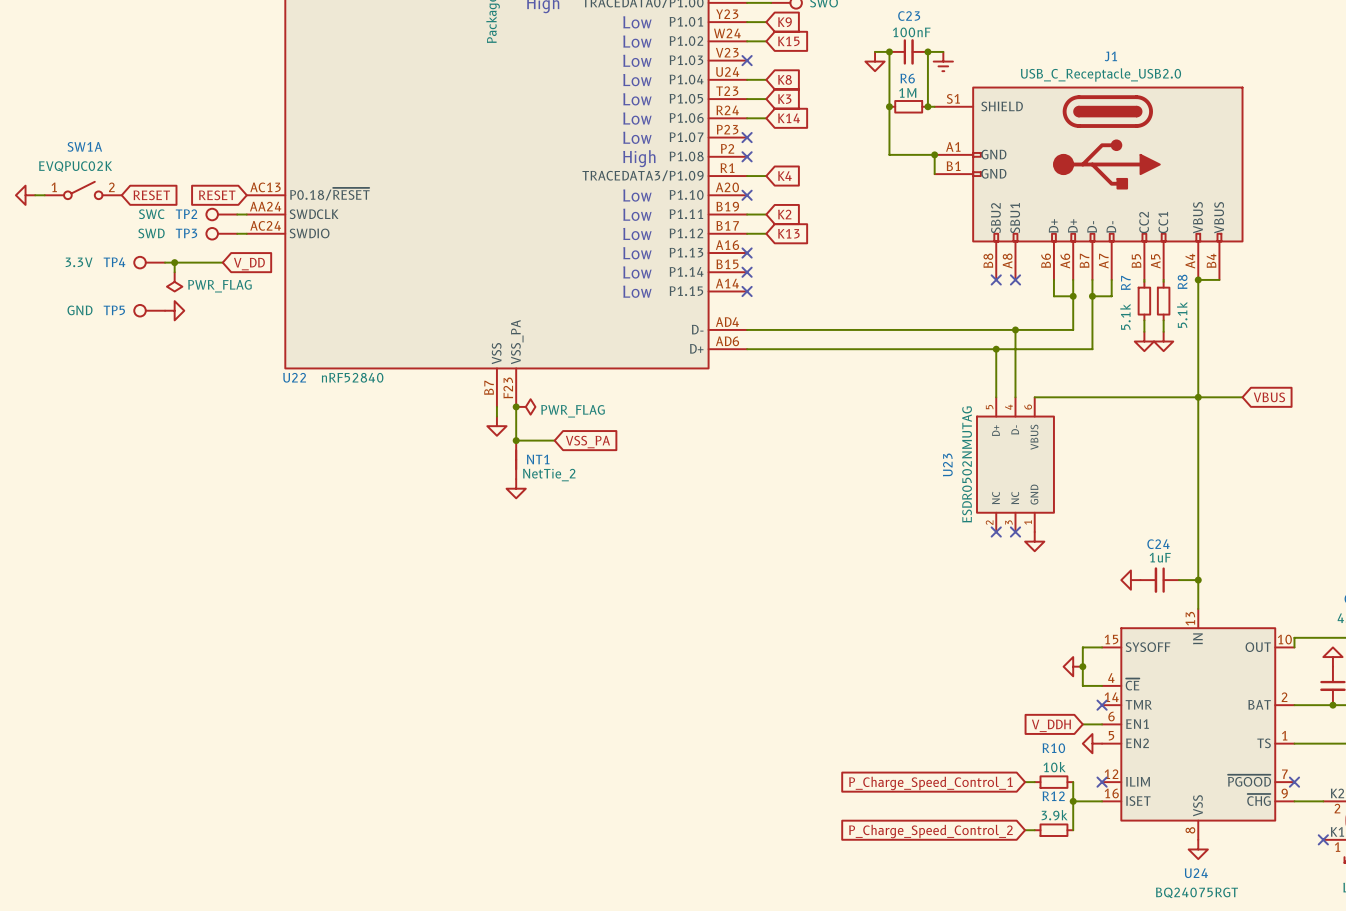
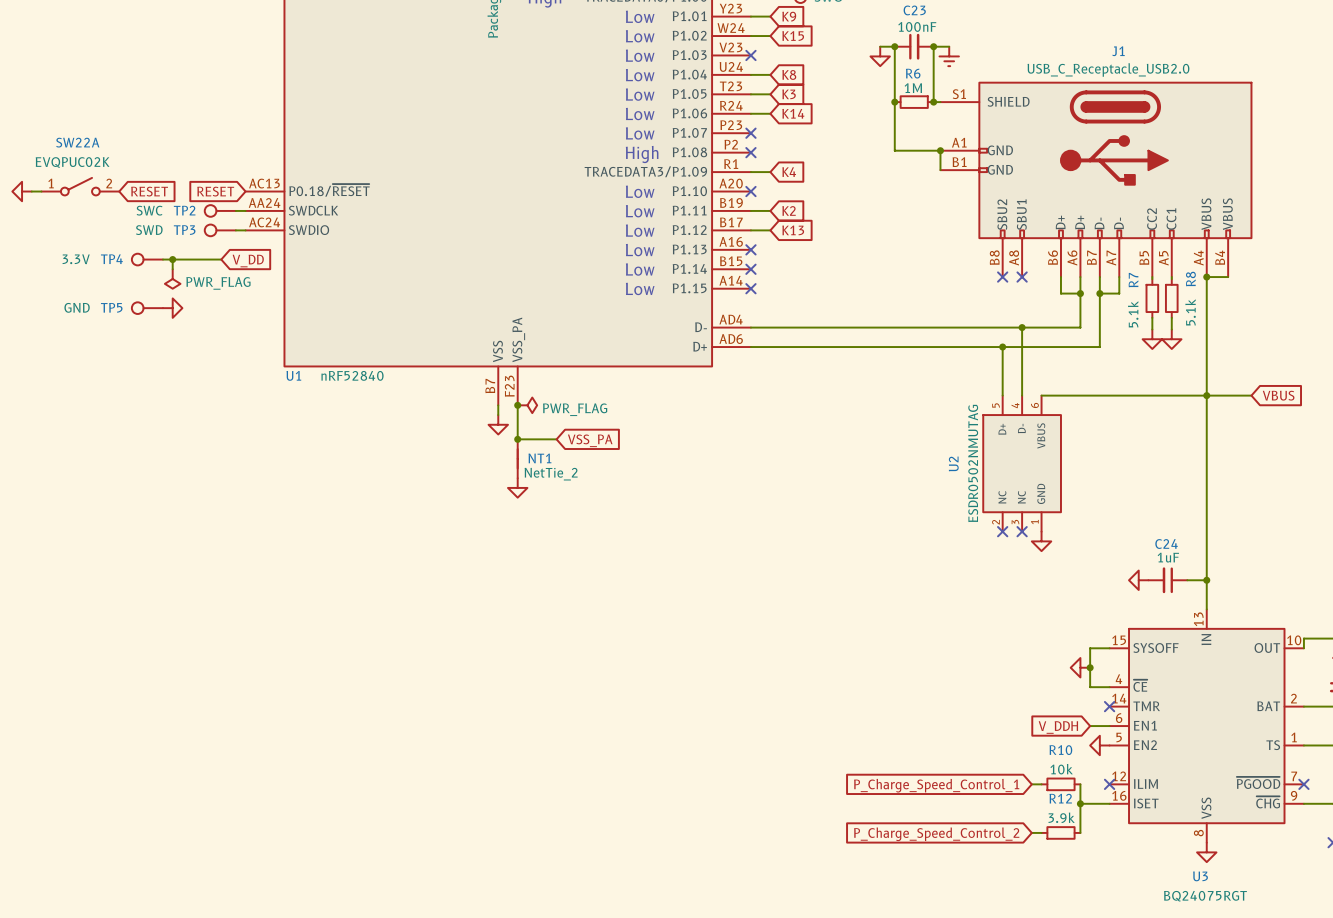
SW1A name: SW1A (84, 146) -> SW22A (77, 142)
U22 name: U22 (294, 377) -> U1 (293, 375)
U23 name: U23 (947, 464) -> U2 (953, 463)
U24 name: U24 (1196, 873) -> U3 (1200, 876)

